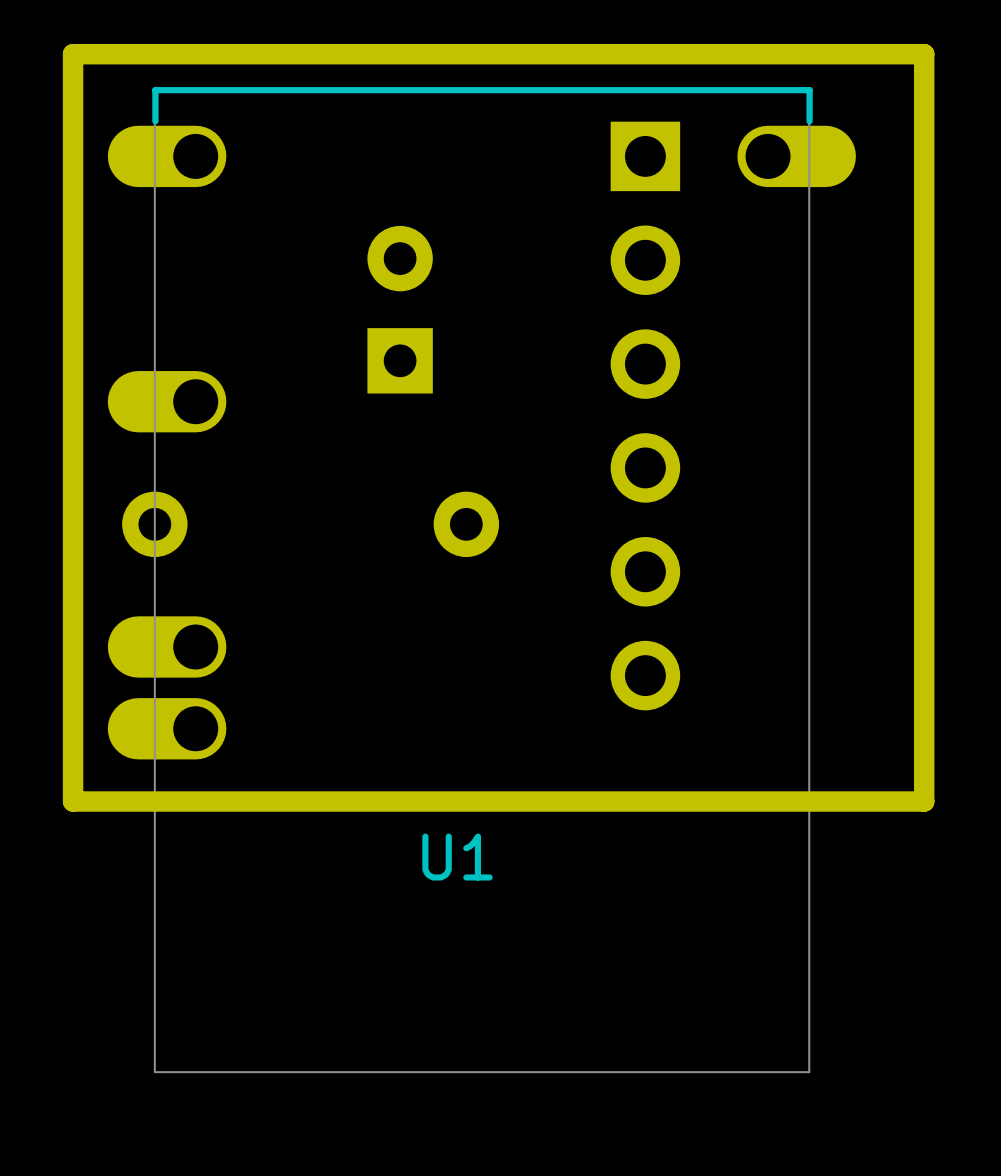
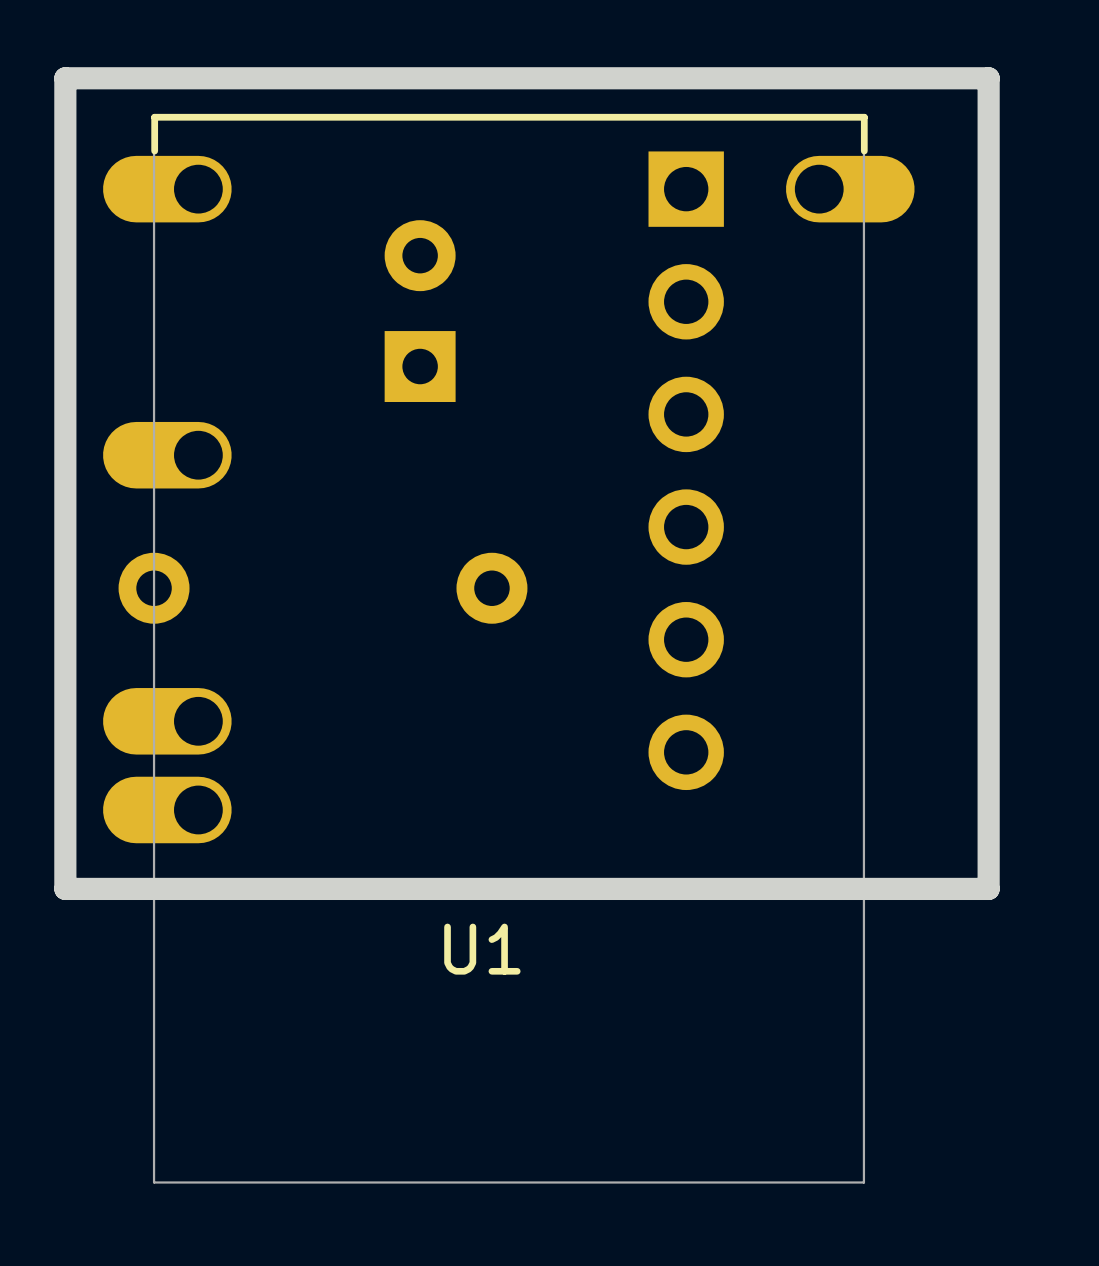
part position: (400, 309) -> (420, 311)

